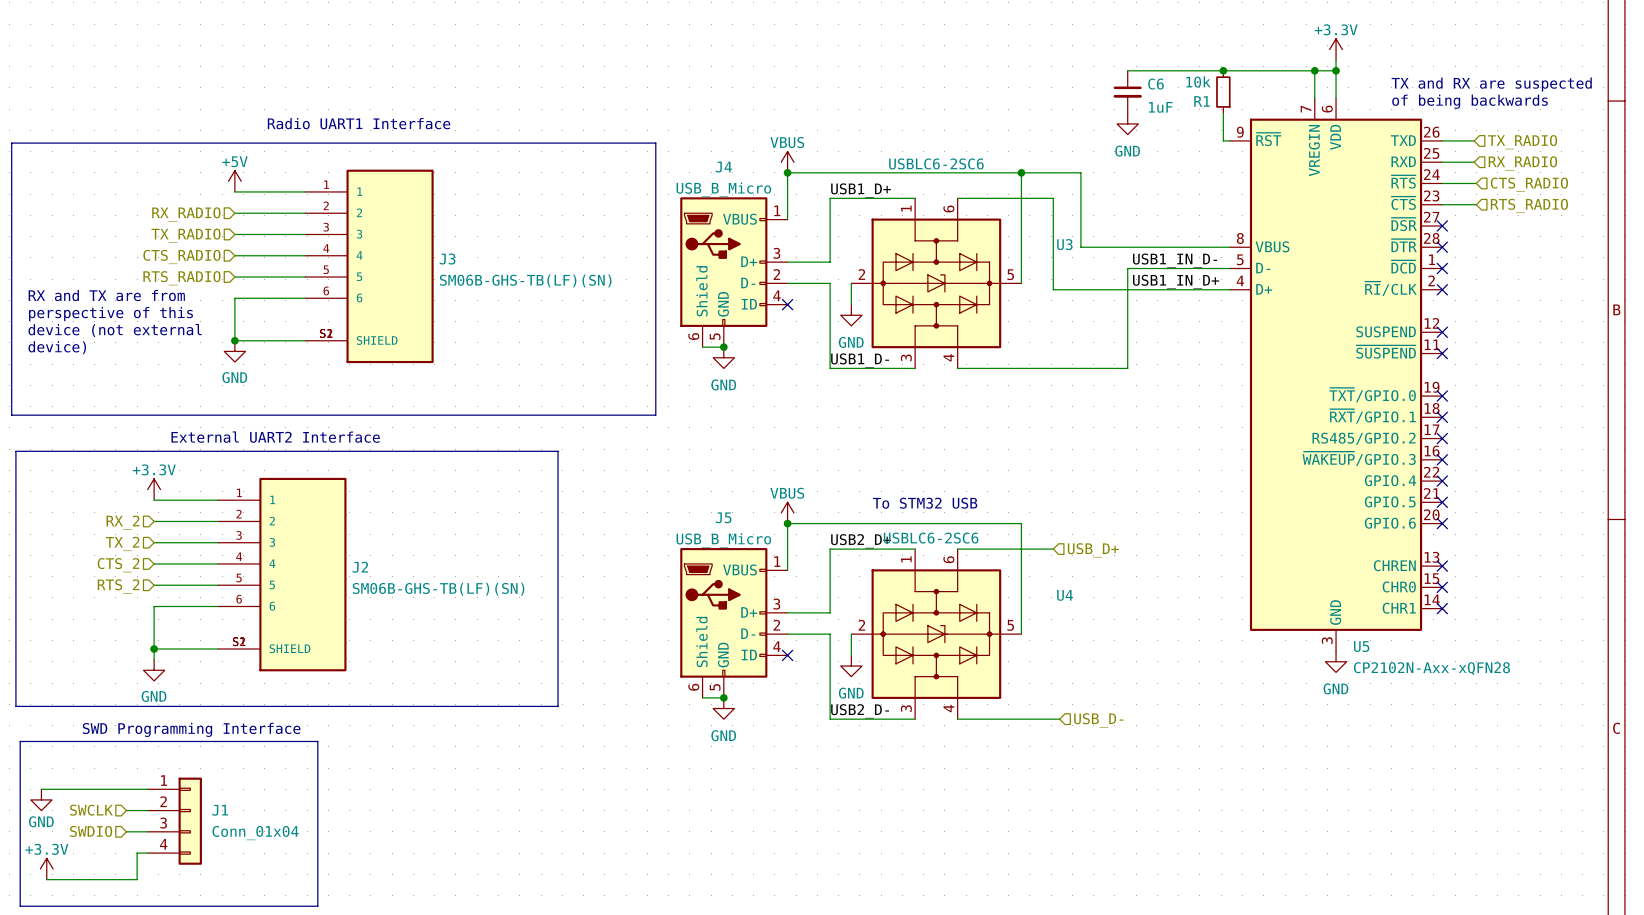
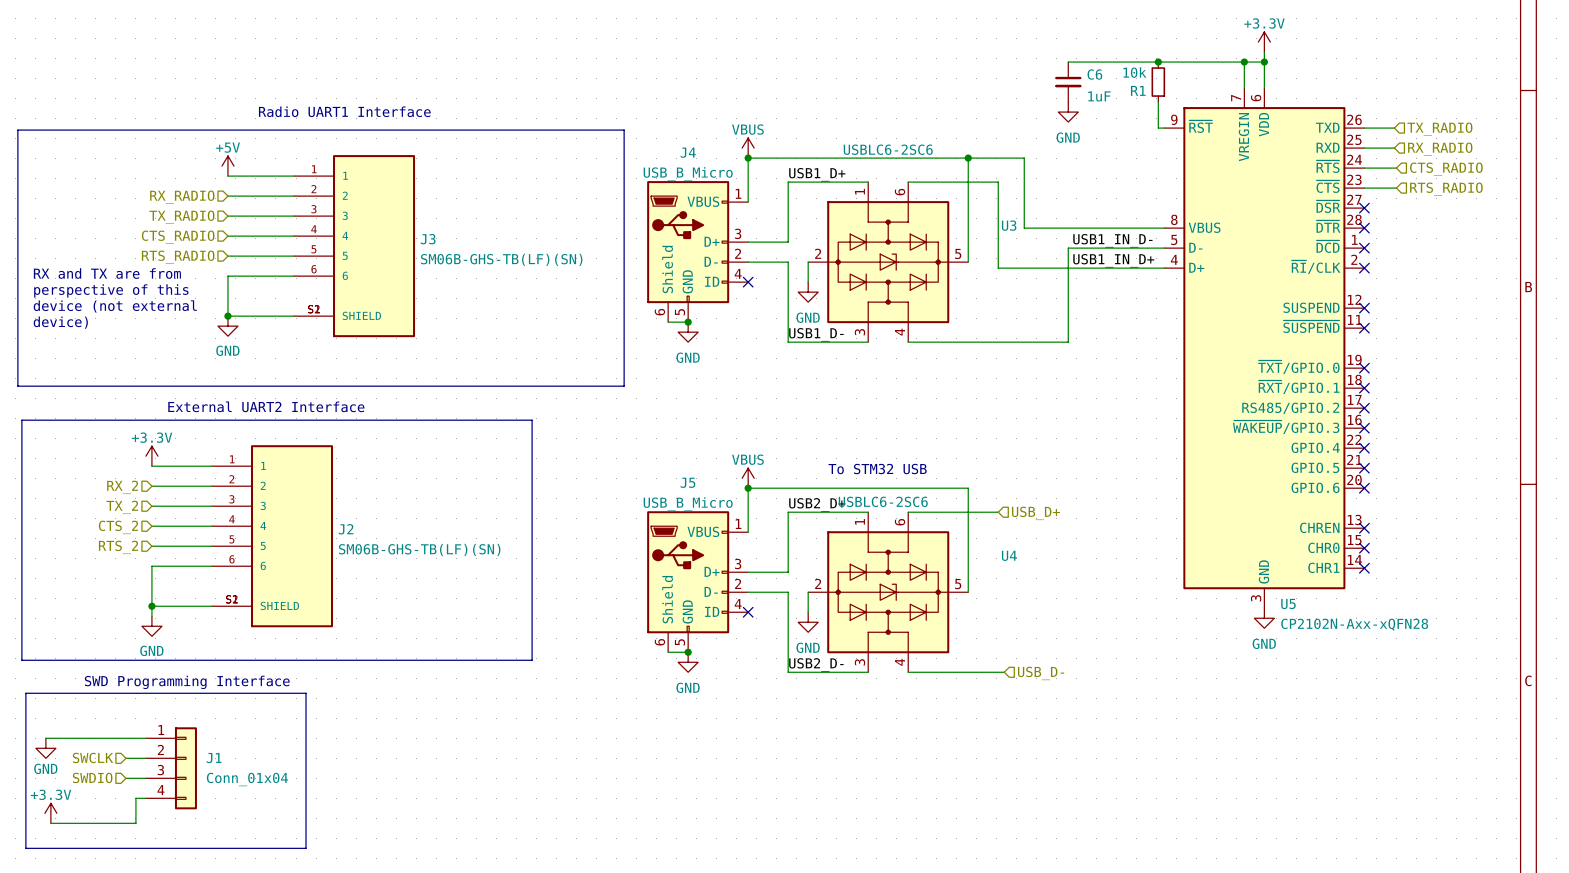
text: TX and RX are suspected (1491, 84) -> none
text: of being backwards (1470, 101) -> none

